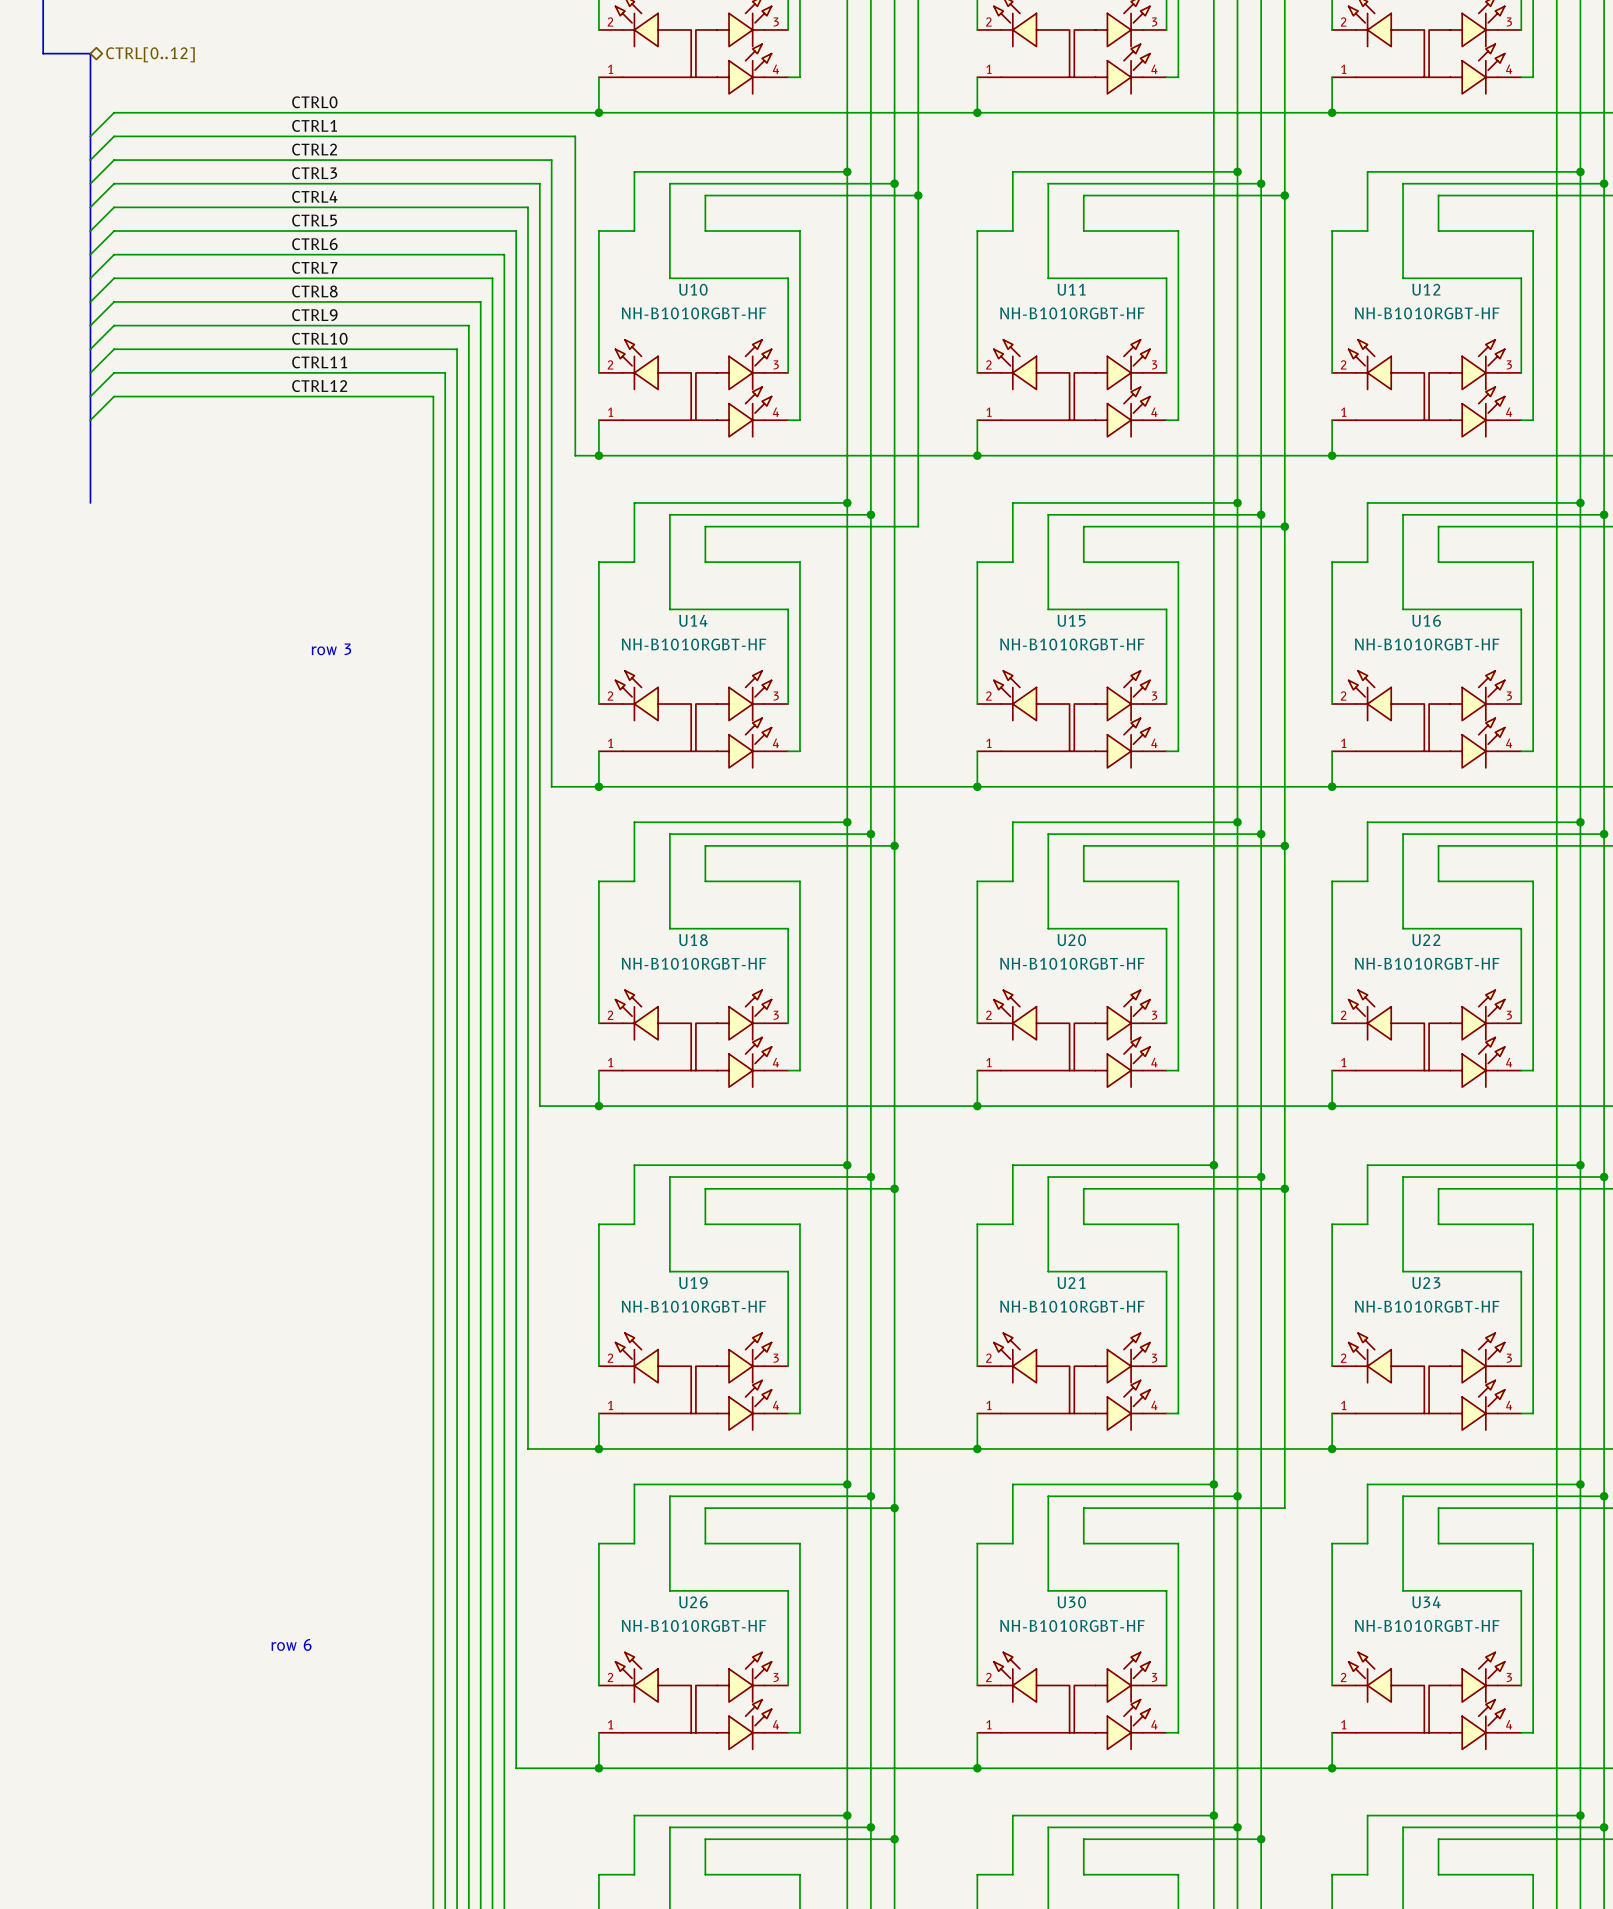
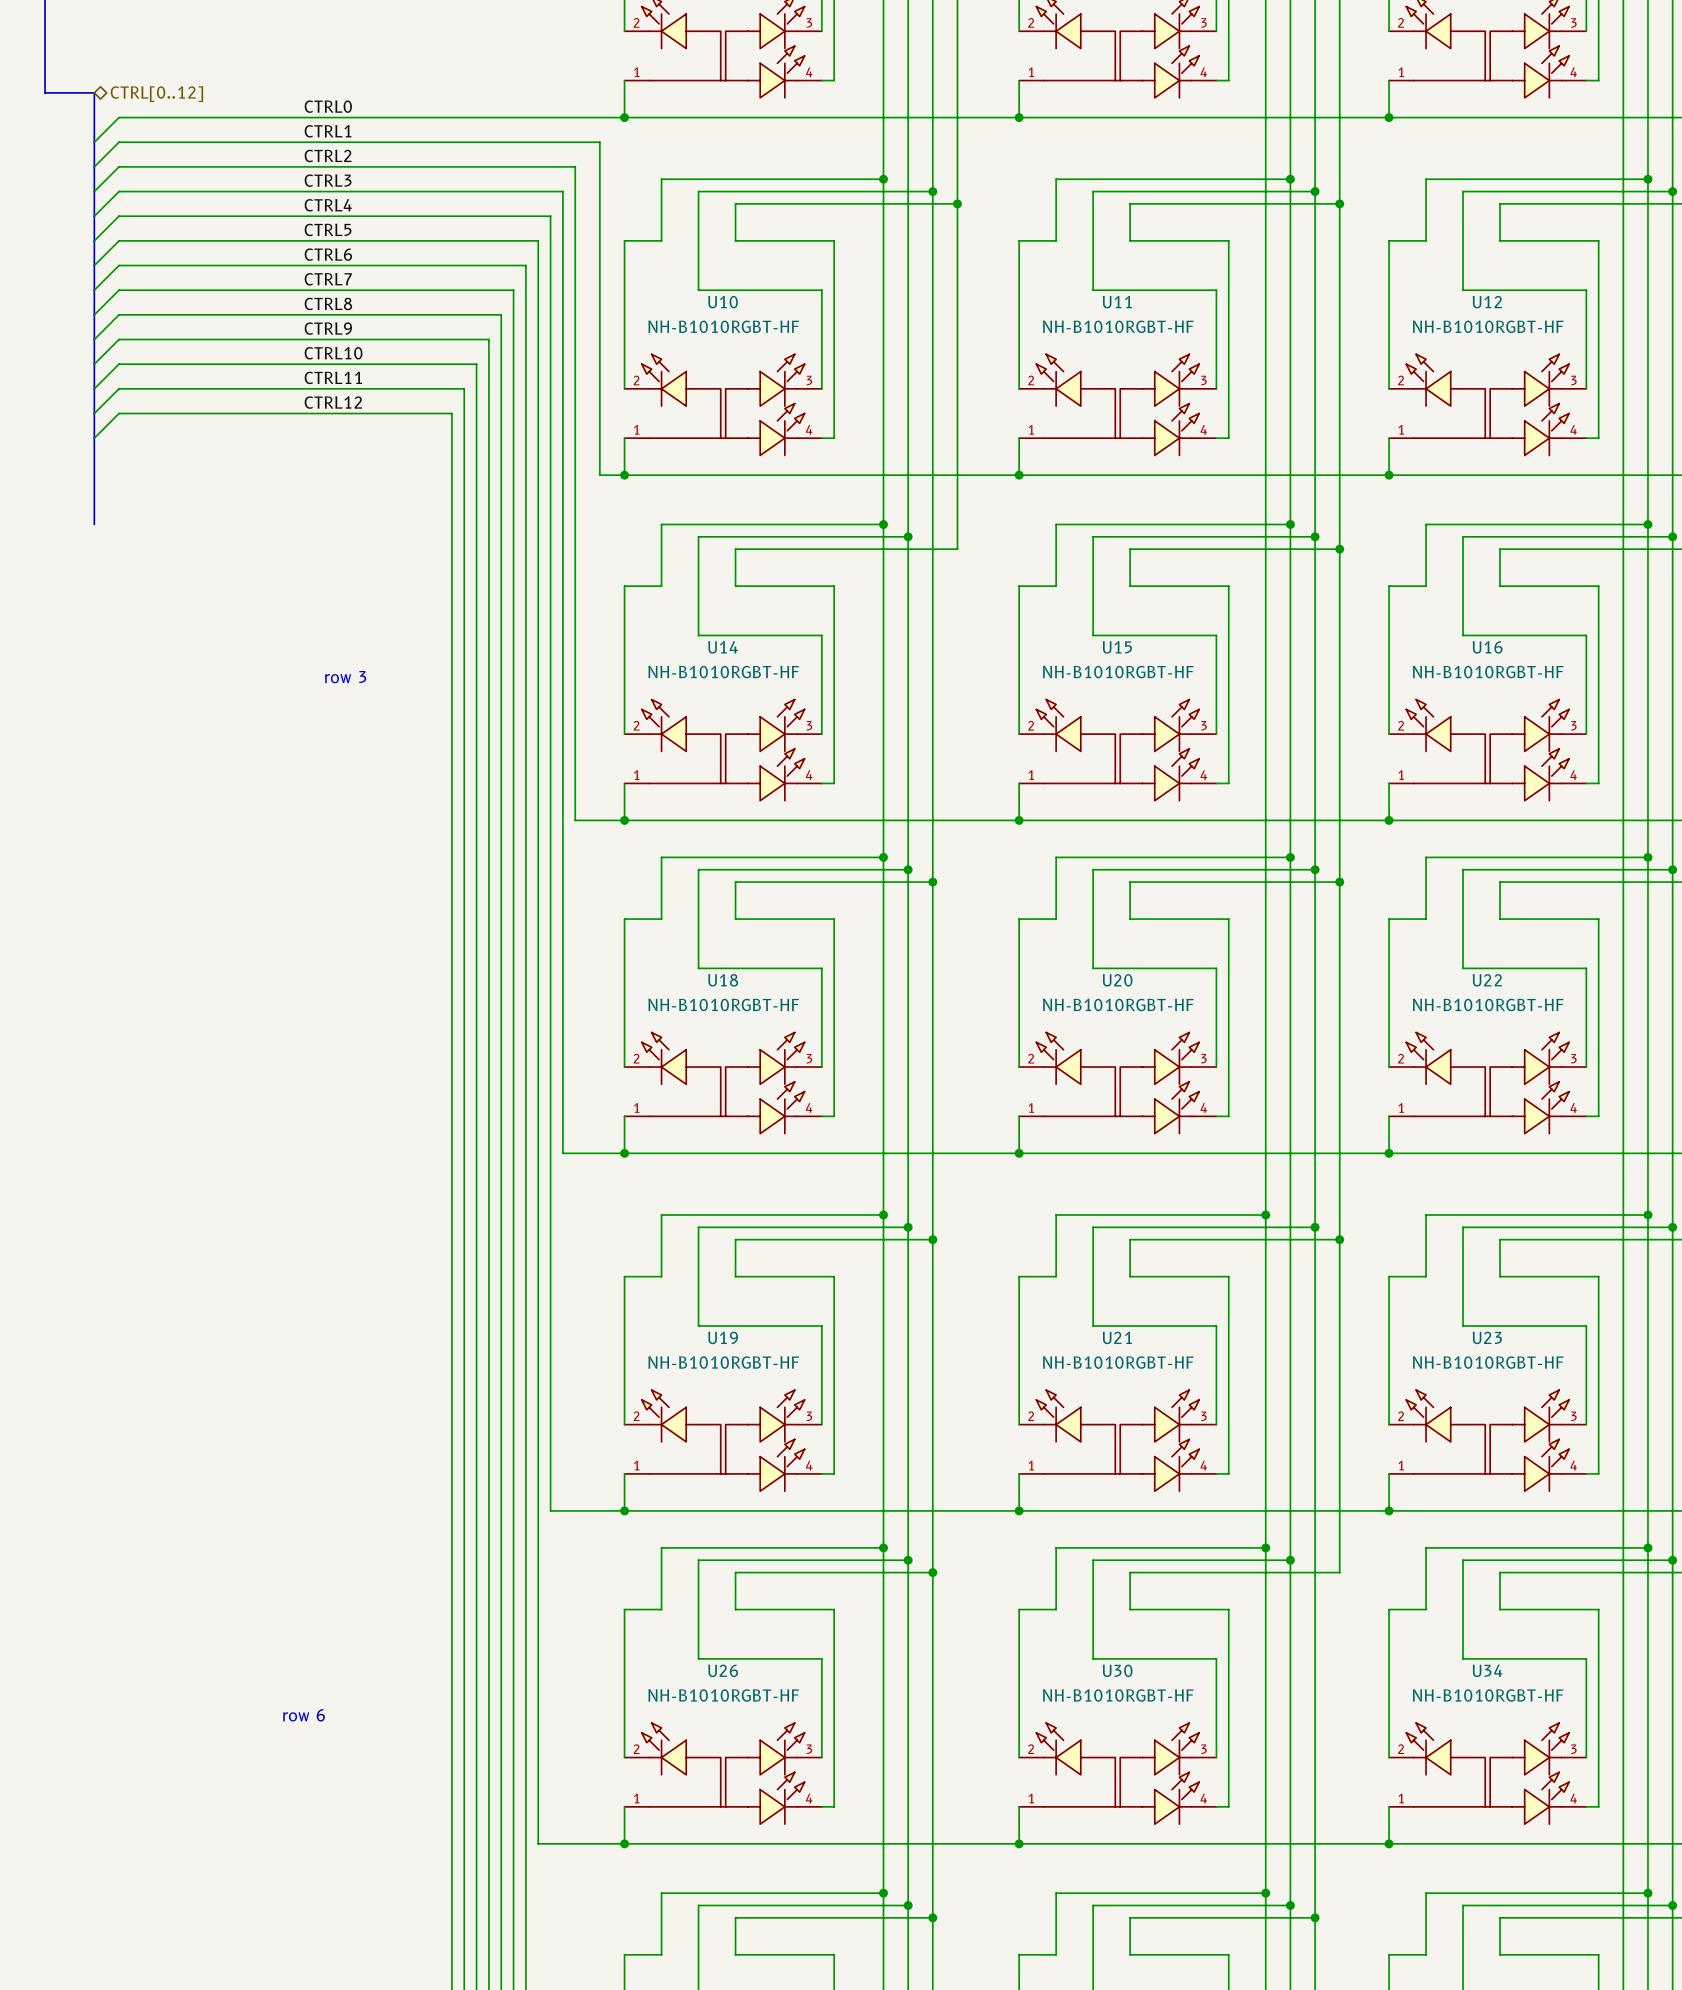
bus: (43, 53) (90, 53) (90, 89) -> (45, 55) (45, 92) (94, 92)
hierarchical label position: CTRL[0..12] (150, 54) -> CTRL[0..12] (157, 94)

